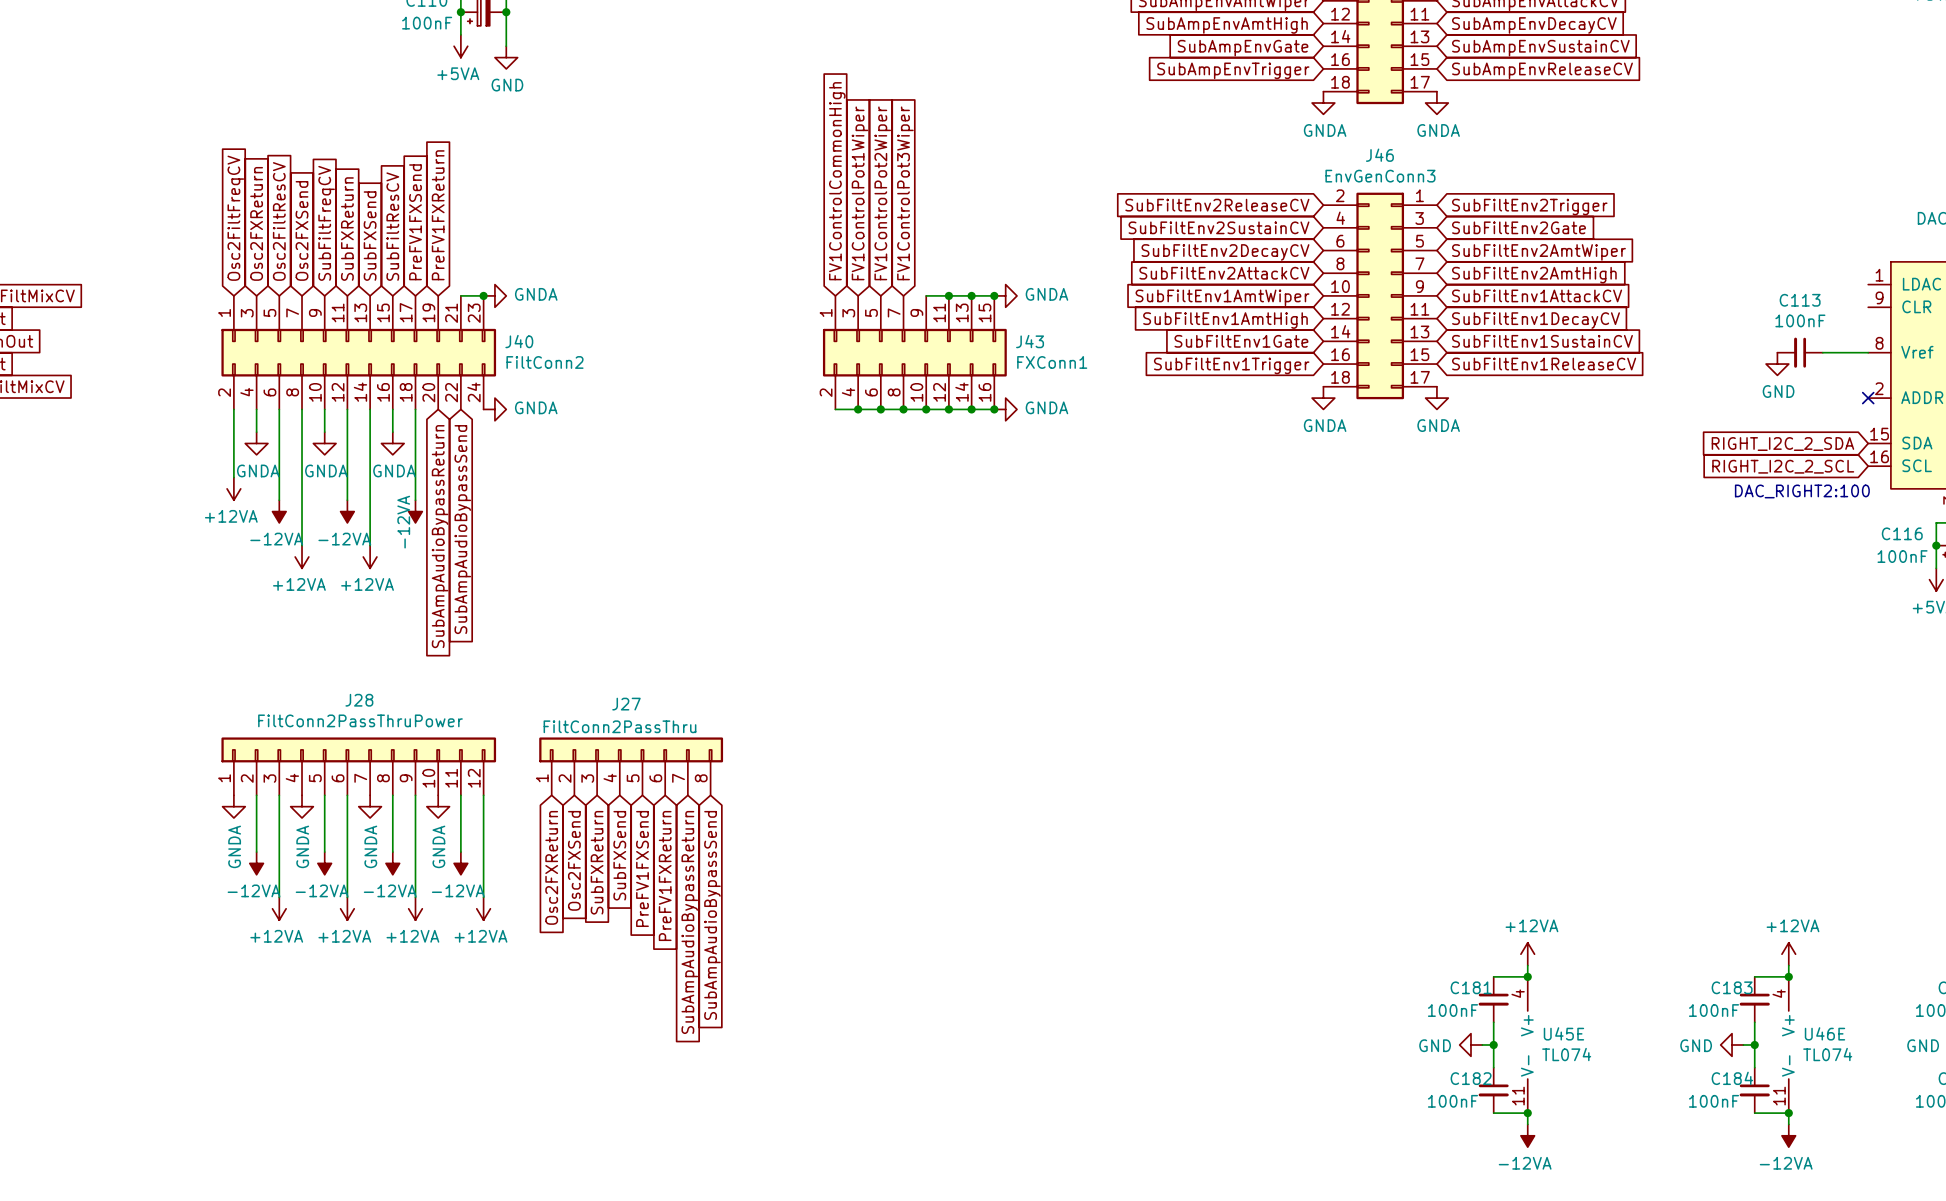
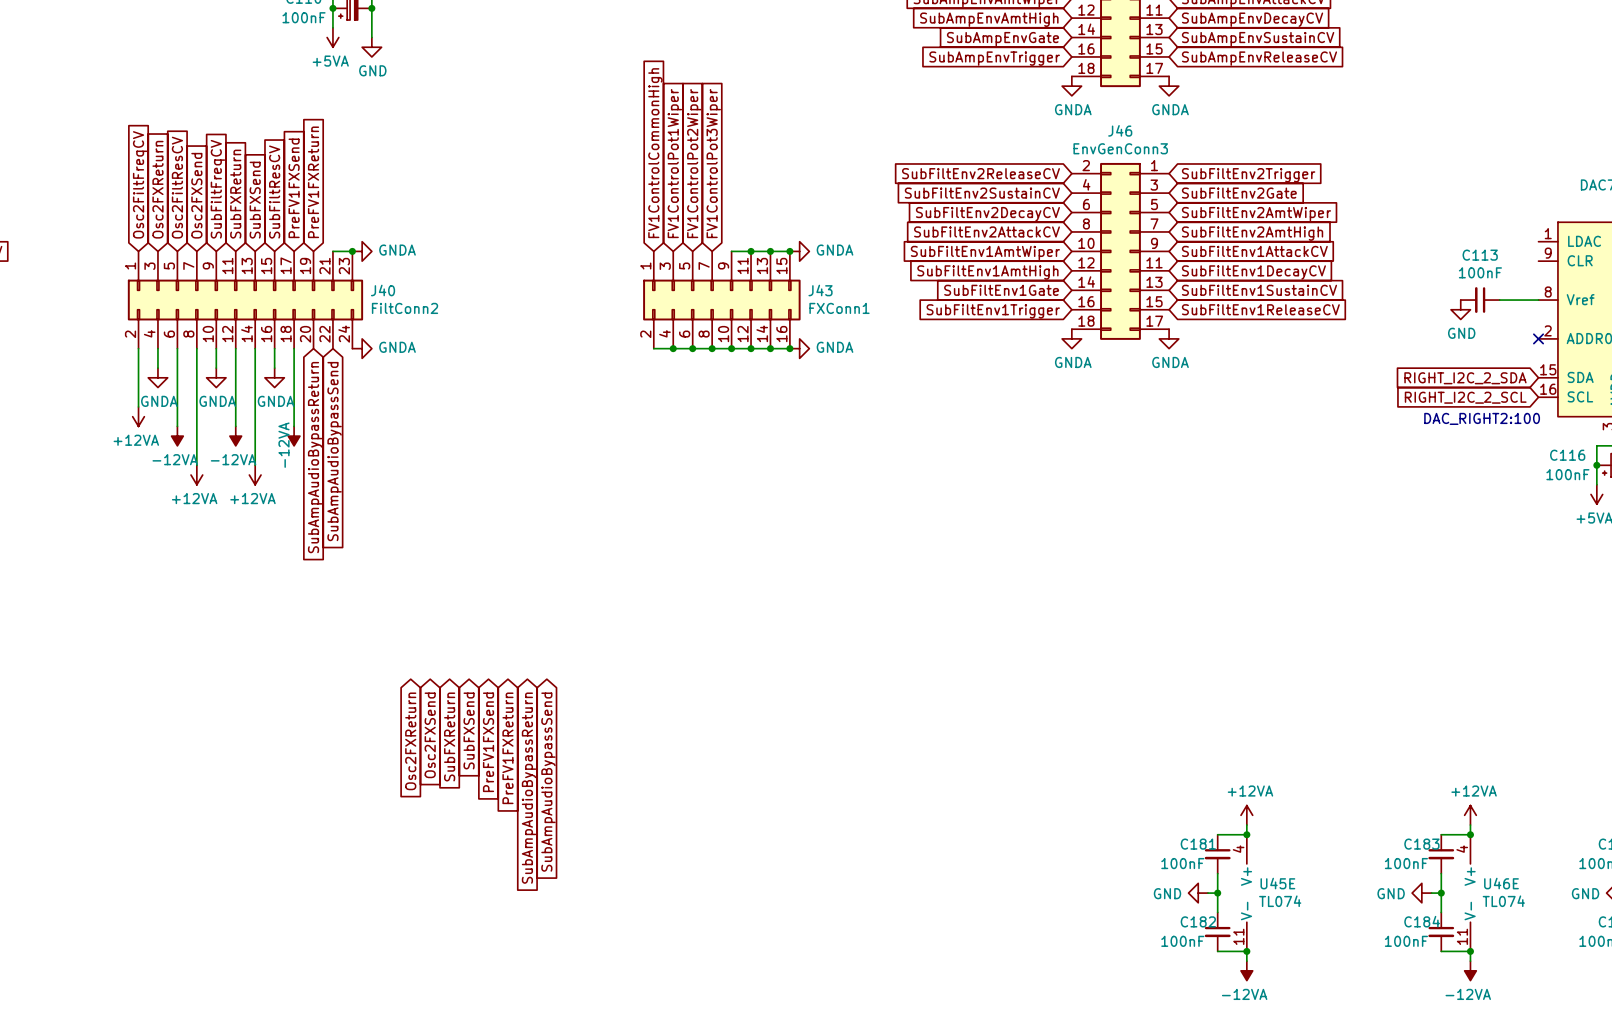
J28: FiltConn2PassThruPower (358, 766) -> none
J27: FiltConn2PassThru (631, 766) -> none
wire: (256, 795) (256, 852) -> none
wire: (279, 795) (279, 897) -> none
wire: (324, 795) (324, 852) -> none
wire: (347, 795) (347, 897) -> none
wire: (392, 795) (392, 852) -> none
wire: (415, 795) (415, 897) -> none
wire: (460, 795) (460, 852) -> none
wire: (483, 795) (483, 897) -> none
power symbol: GNDA (233, 806) -> none
power symbol: GNDA (302, 806) -> none
power symbol: GNDA (370, 806) -> none
power symbol: GNDA (438, 806) -> none
power symbol: -12VA (256, 863) -> none
power symbol: -12VA (324, 863) -> none
power symbol: -12VA (392, 863) -> none
power symbol: -12VA (460, 863) -> none
power symbol: +12VA (279, 908) -> none
power symbol: +12VA (347, 908) -> none
power symbol: +12VA (415, 908) -> none
power symbol: +12VA (483, 908) -> none

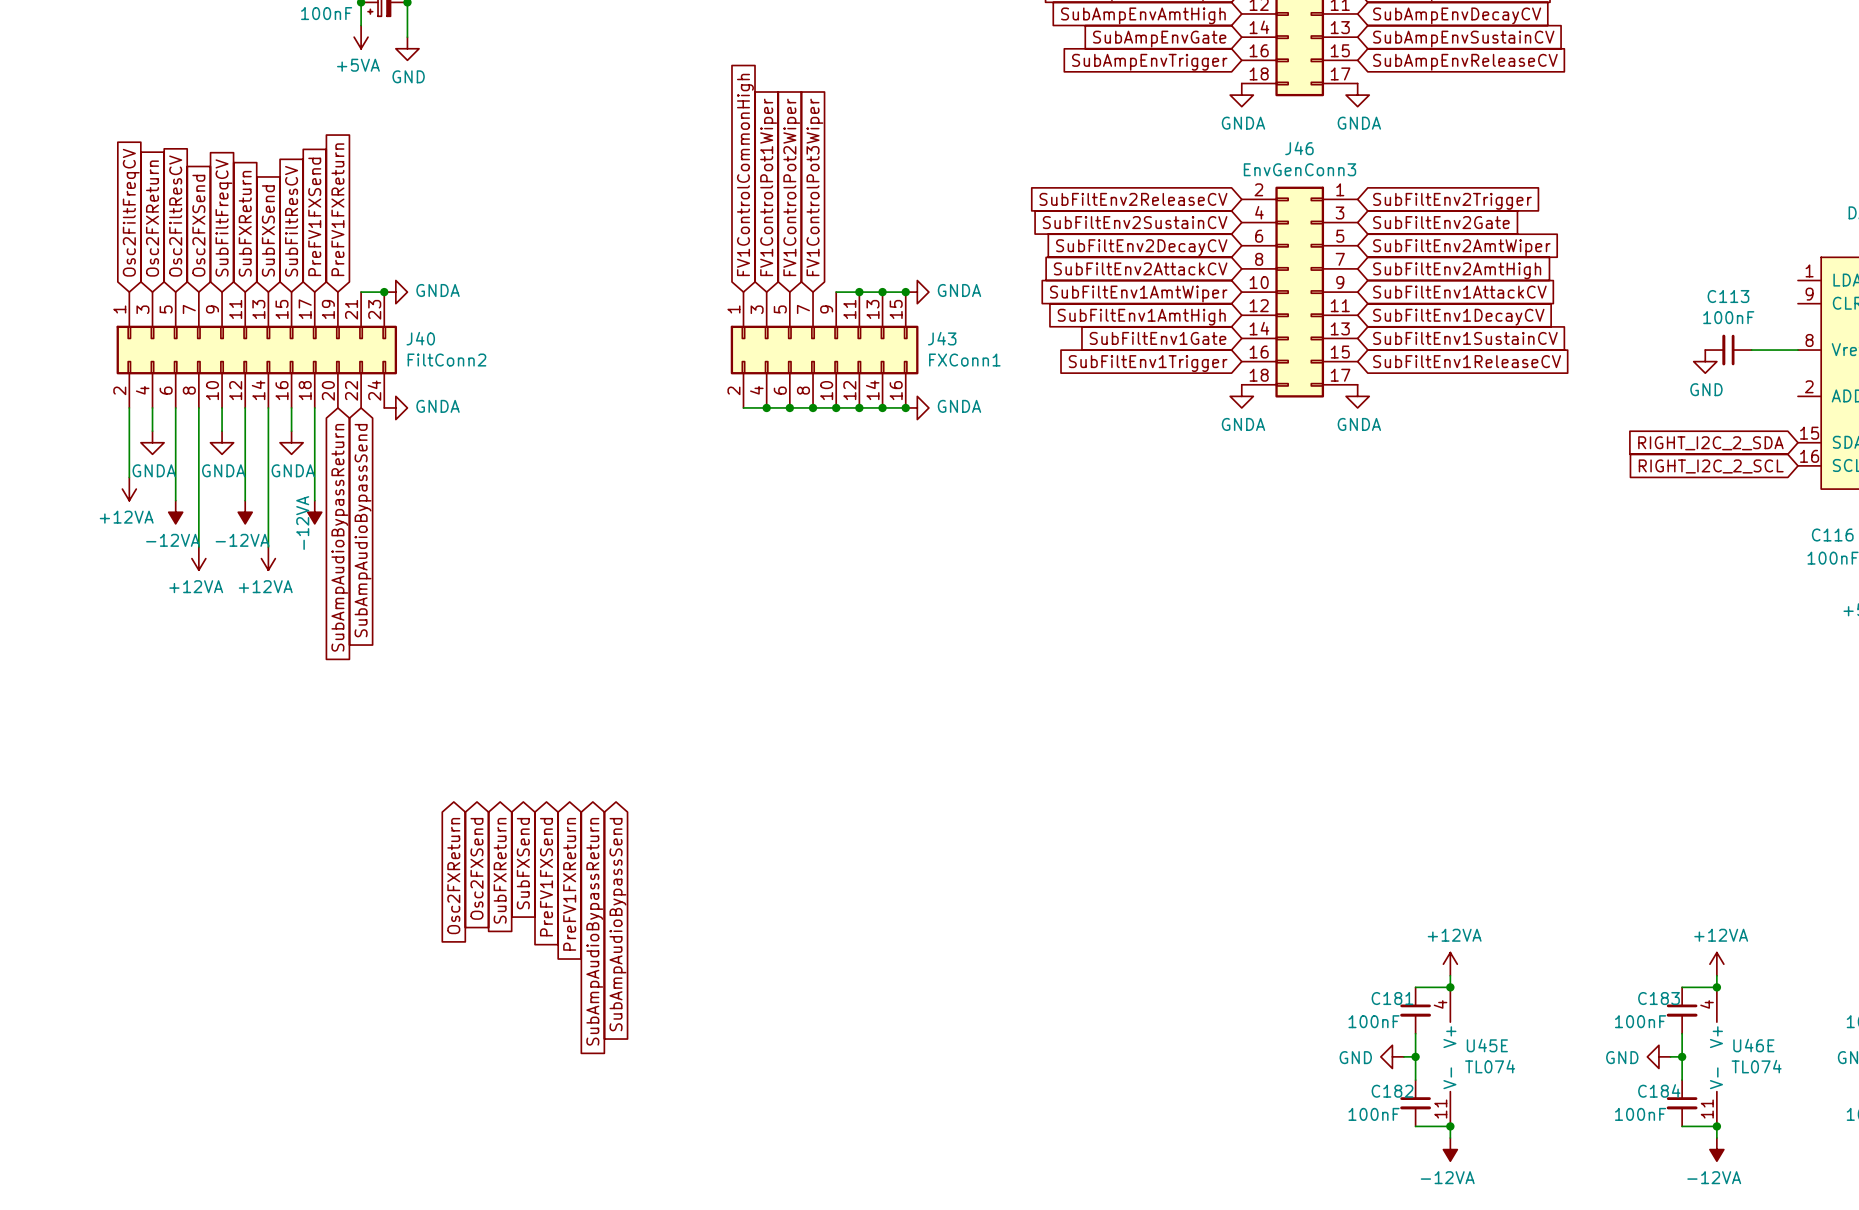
no-connect mark: (1538, 338) -> none
text: DAC_RIGHT2:100 (1482, 418) -> none

